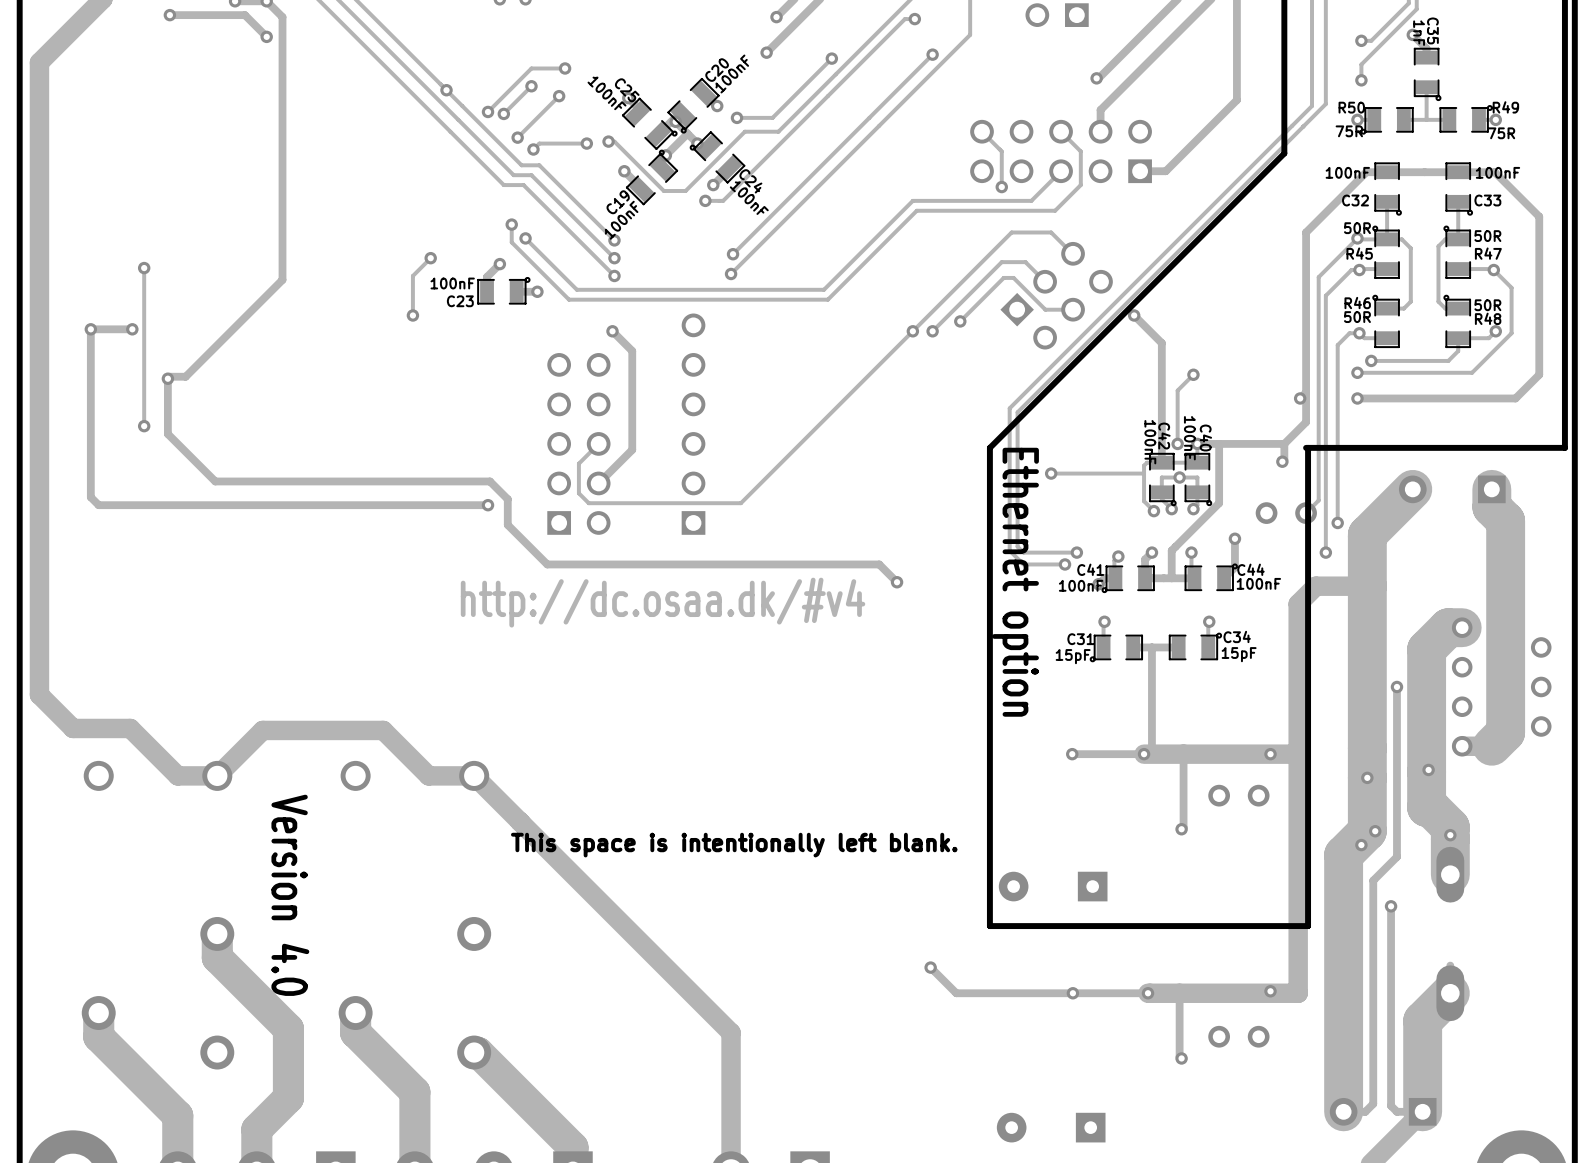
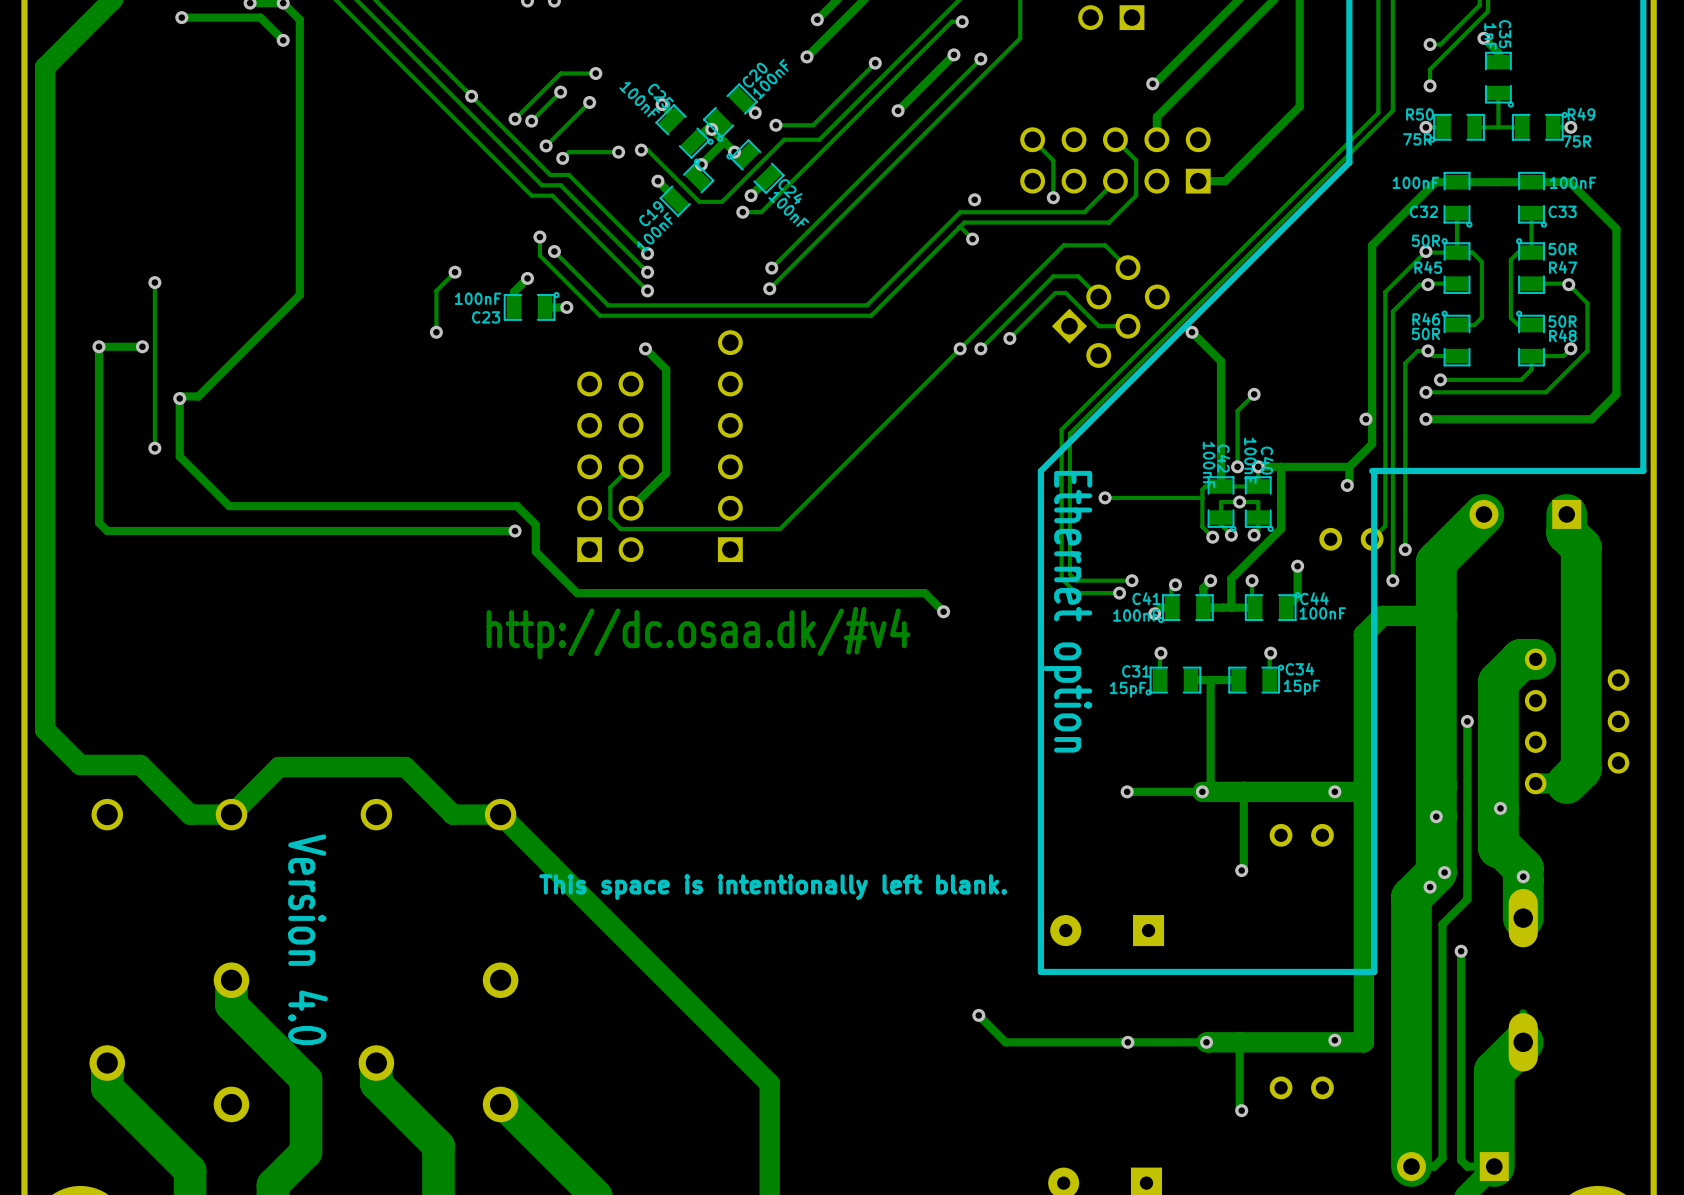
track: none -> (953, 54) (898, 110)
via: none -> (953, 54)
via: none -> (898, 110)
via: none -> (974, 199)
track: none -> (959, 227) (972, 239)
via: none -> (972, 239)

